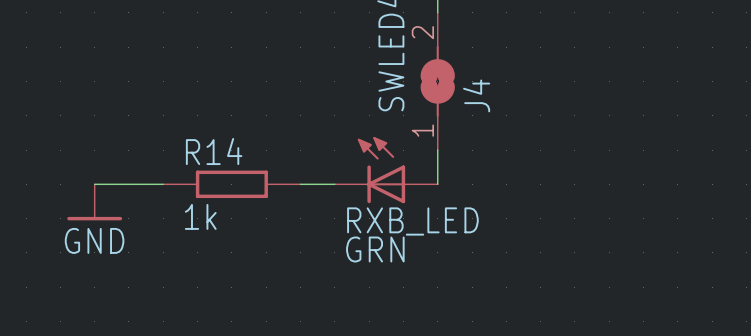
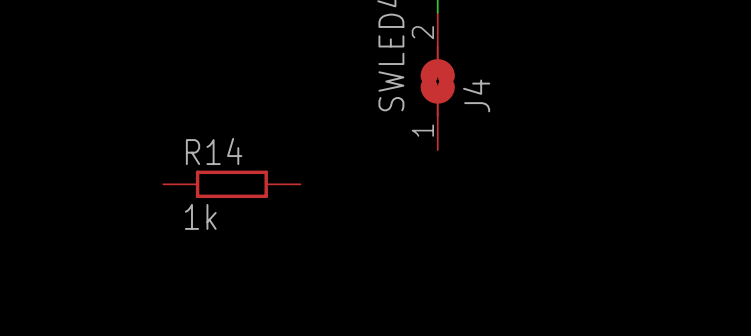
wire: (437, 150) (437, 184) -> none
RXB_LED: GRN (386, 170) -> none
wire: (94, 184) (163, 184) -> none
wire: (300, 184) (334, 184) -> none
power symbol: GND (94, 202) -> none

